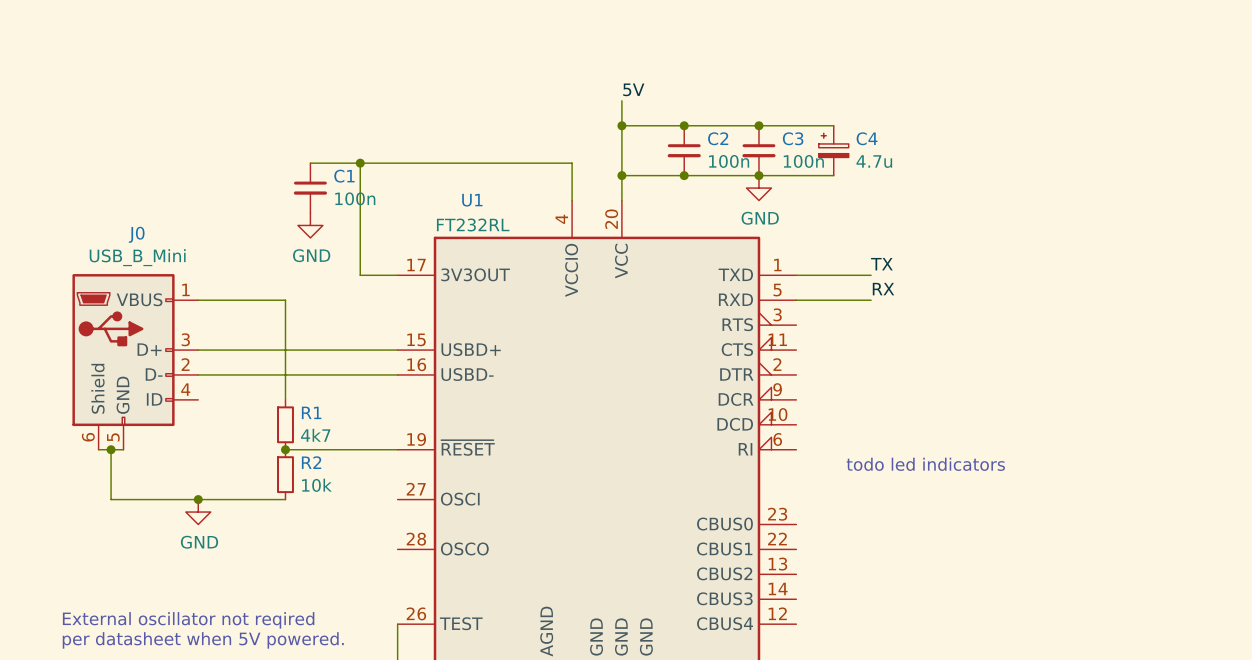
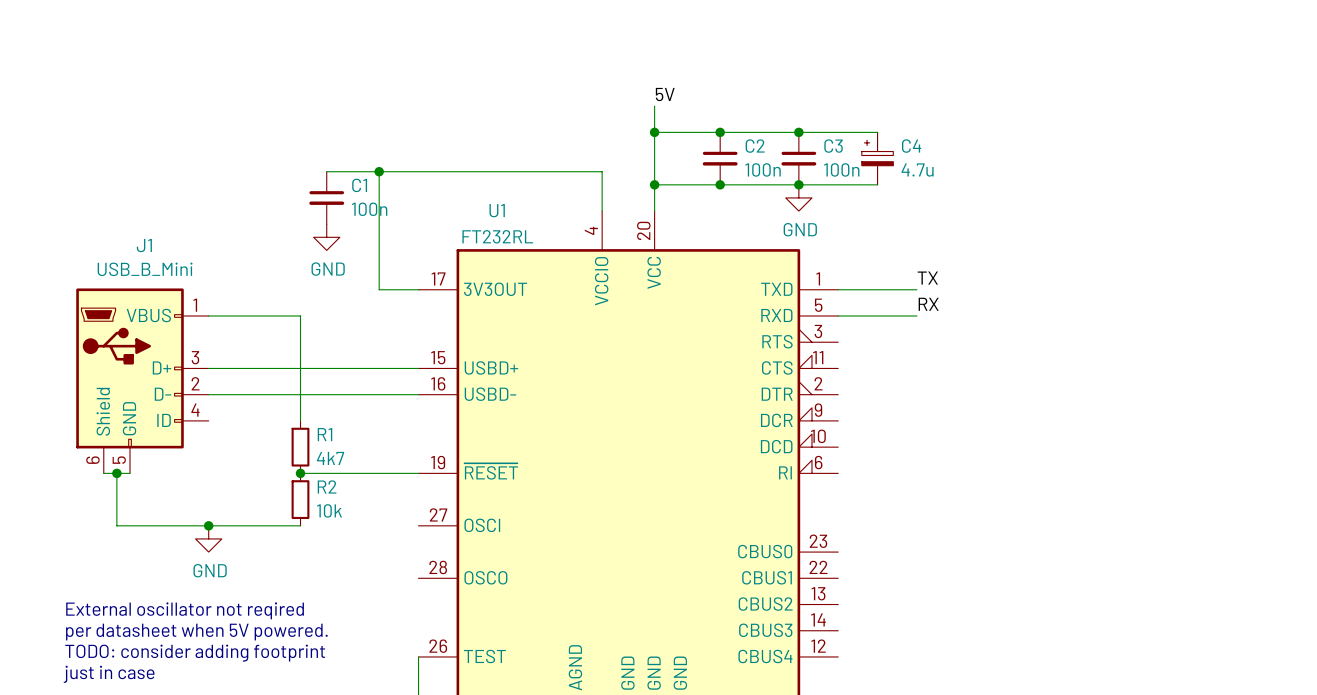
J0 name: J0 (136, 234) -> J1 (144, 245)
text: todo led indicators (925, 464) -> none
text: none -> External oscillator not reqired (185, 610)
text: none -> per datasheet when 5V powered. (196, 632)
text: External oscillator not reqired (188, 620) -> TODO: consider adding footprint (195, 653)
text: per datasheet when 5V powered. (203, 640) -> just in case (109, 674)

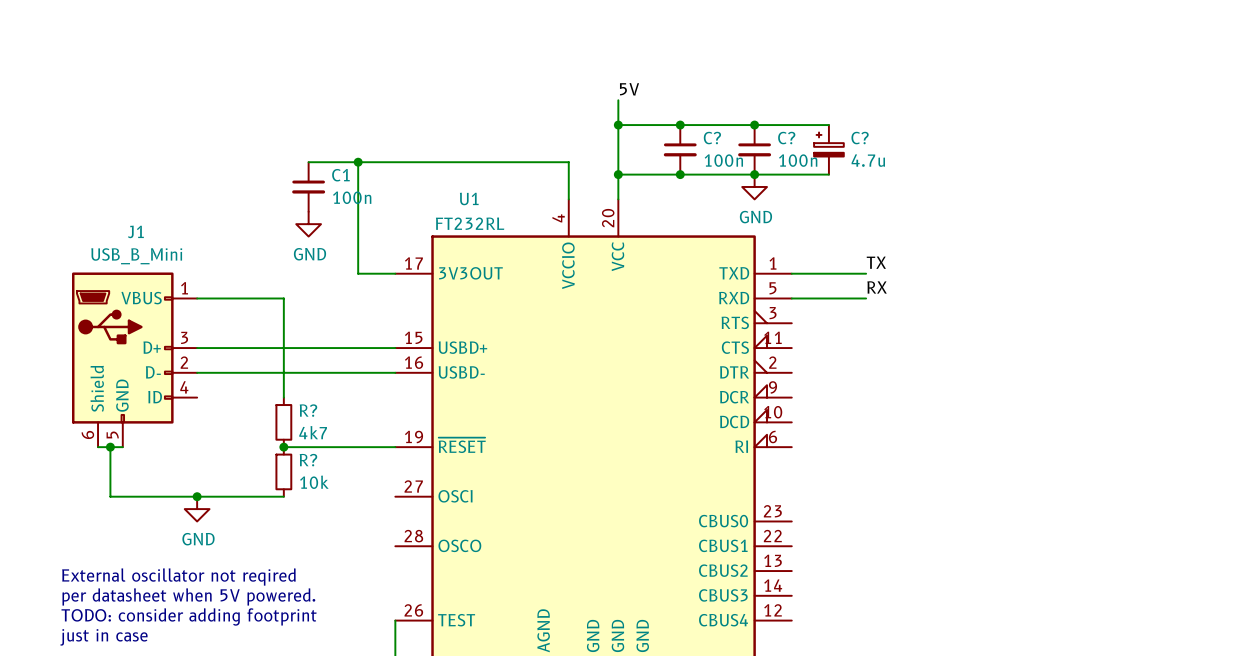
C2 name: C2 (755, 146) -> C? (712, 138)
C3 name: C3 (833, 146) -> C? (786, 138)
C4 name: C4 (911, 146) -> C? (860, 138)
R1 name: R1 (324, 434) -> R? (308, 410)
R2 name: R2 (327, 486) -> R? (308, 460)

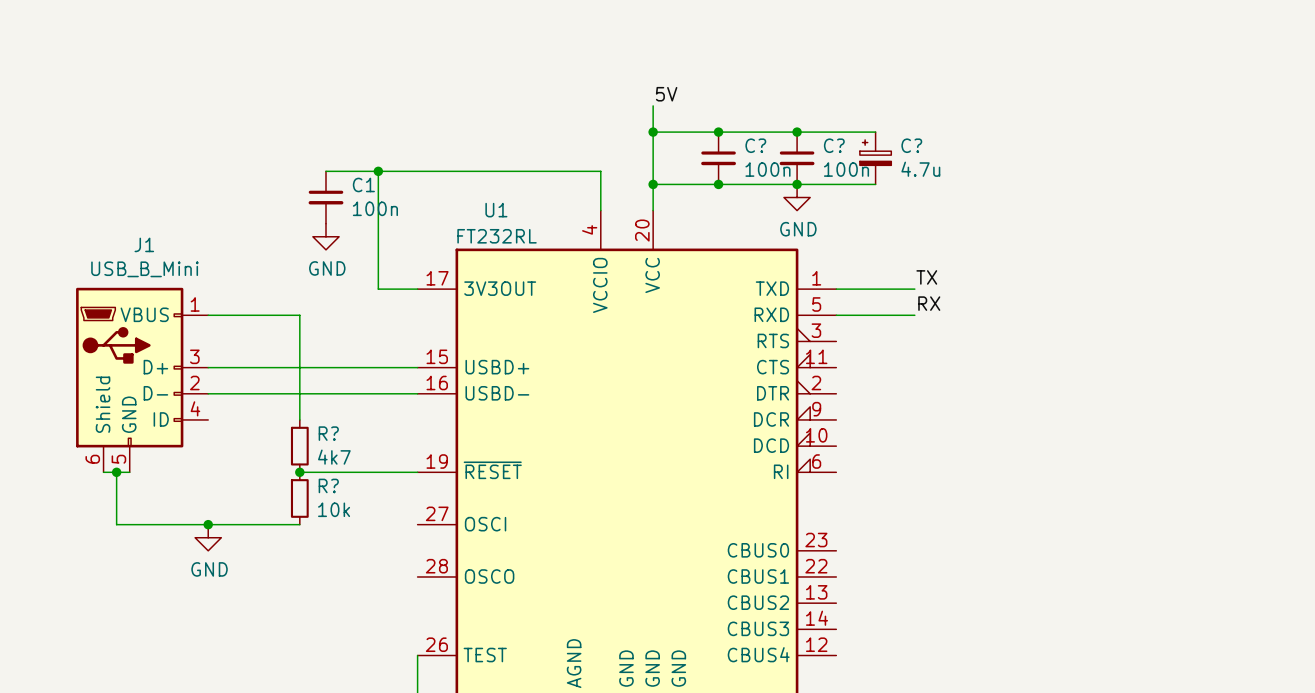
text: External oscillator not reqired (178, 577) -> none
text: per datasheet when 5V powered. (188, 596) -> none
text: TODO: consider adding footprint (189, 616) -> none
text: just in case (103, 637) -> none

